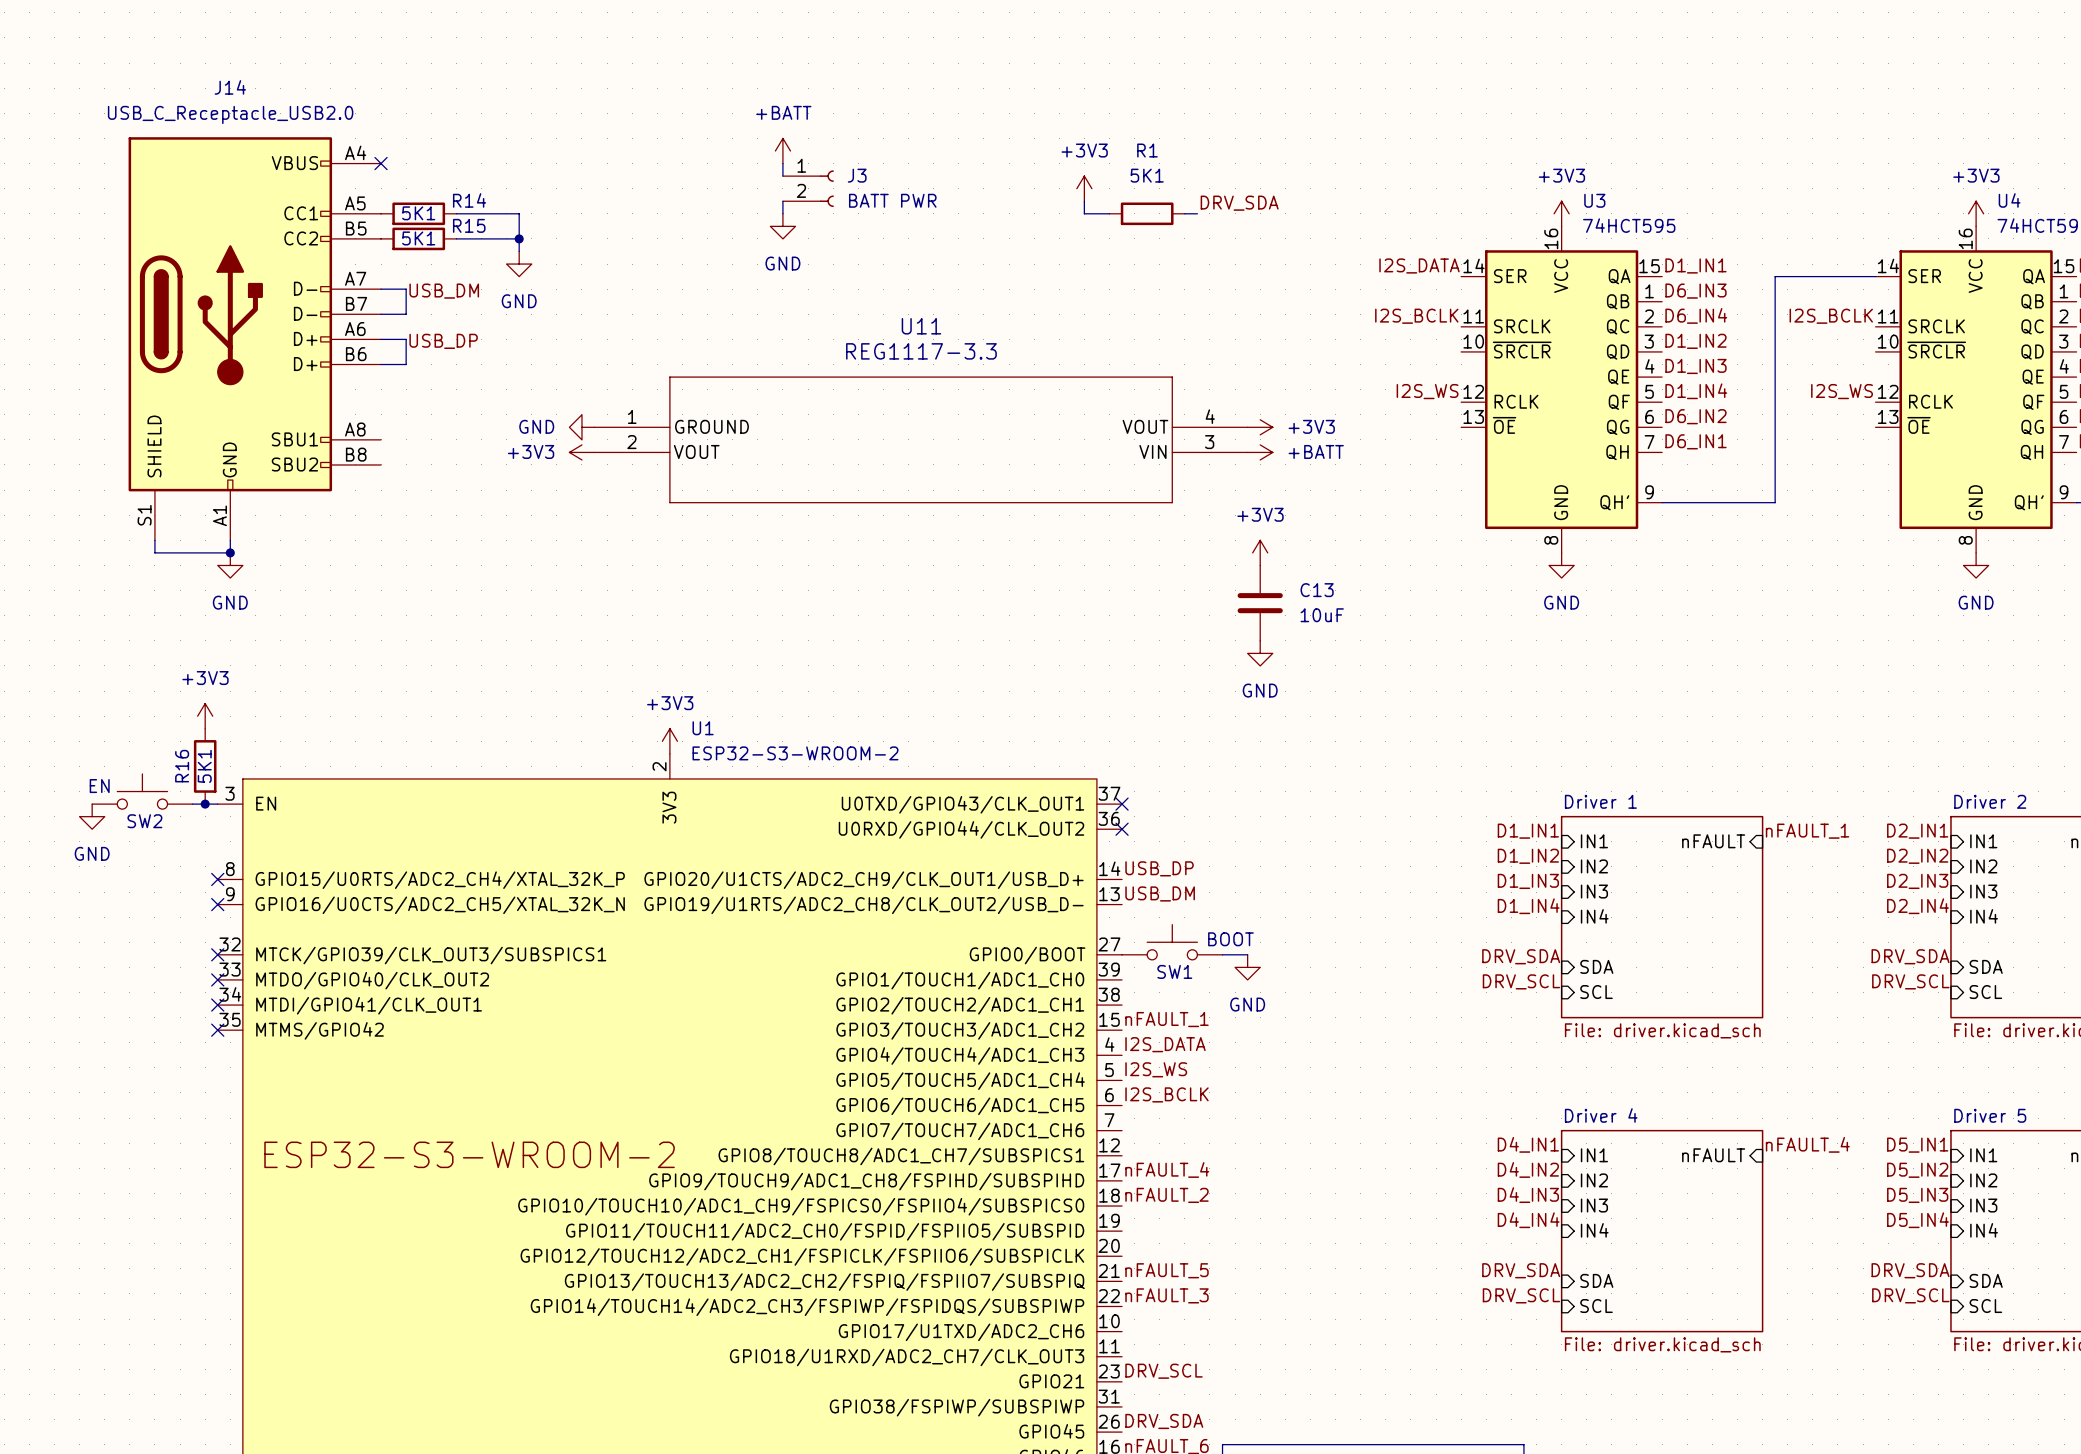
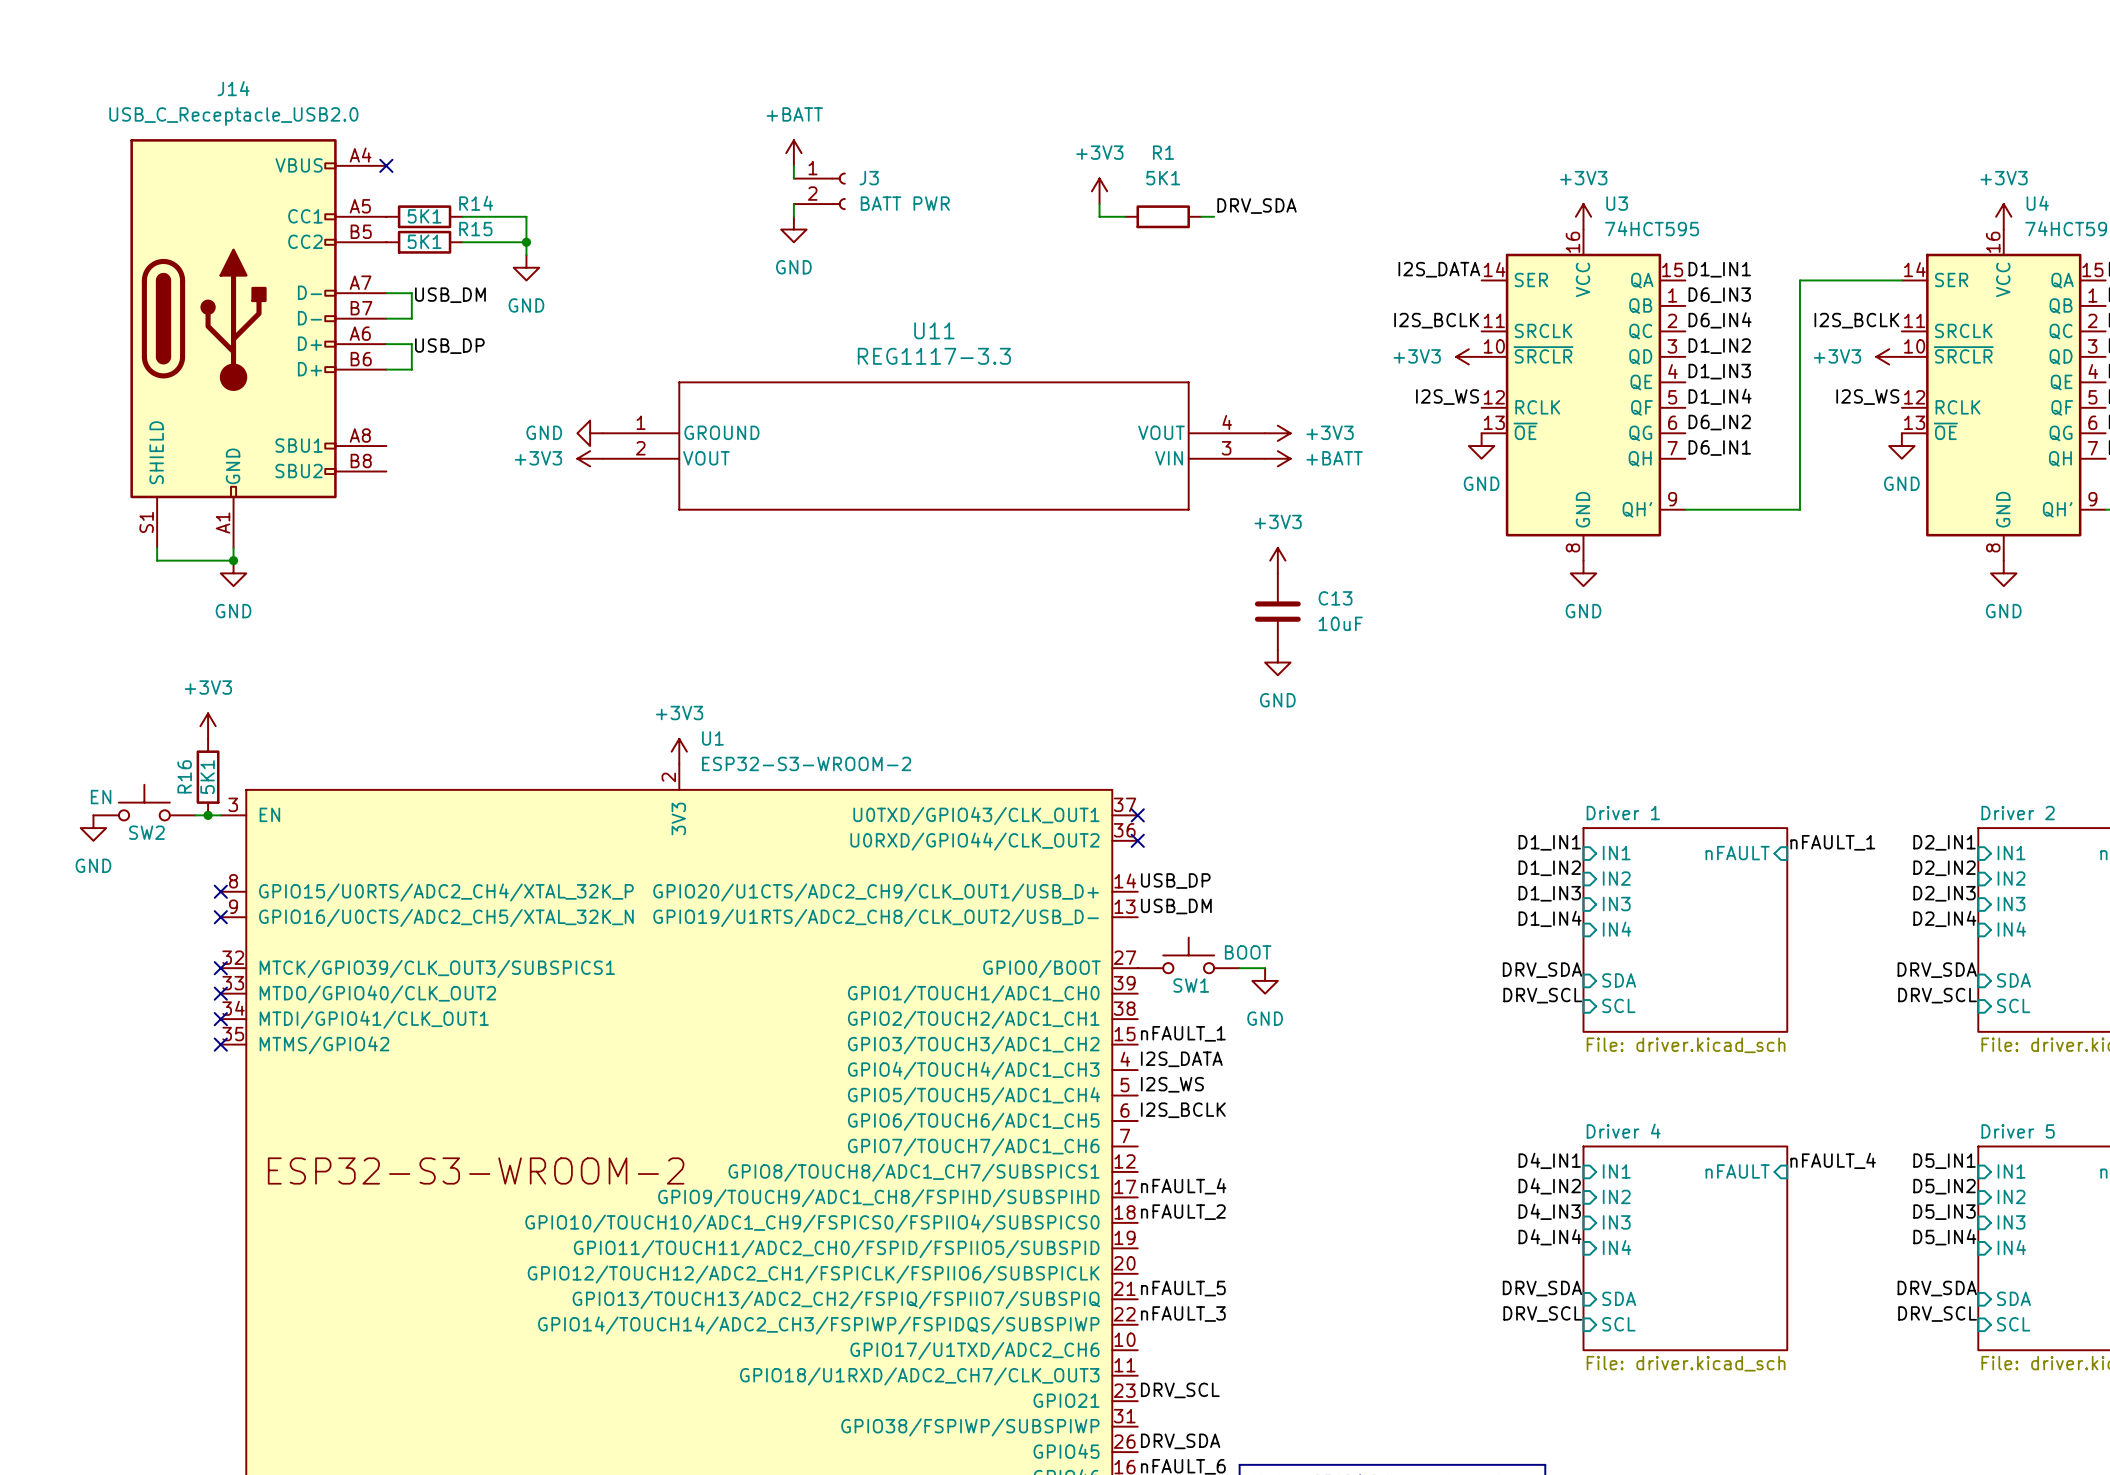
power symbol: none -> +3V3 (1468, 356)
power symbol: none -> +3V3 (1889, 356)
power symbol: none -> GND (1481, 446)
power symbol: none -> GND (1901, 446)

